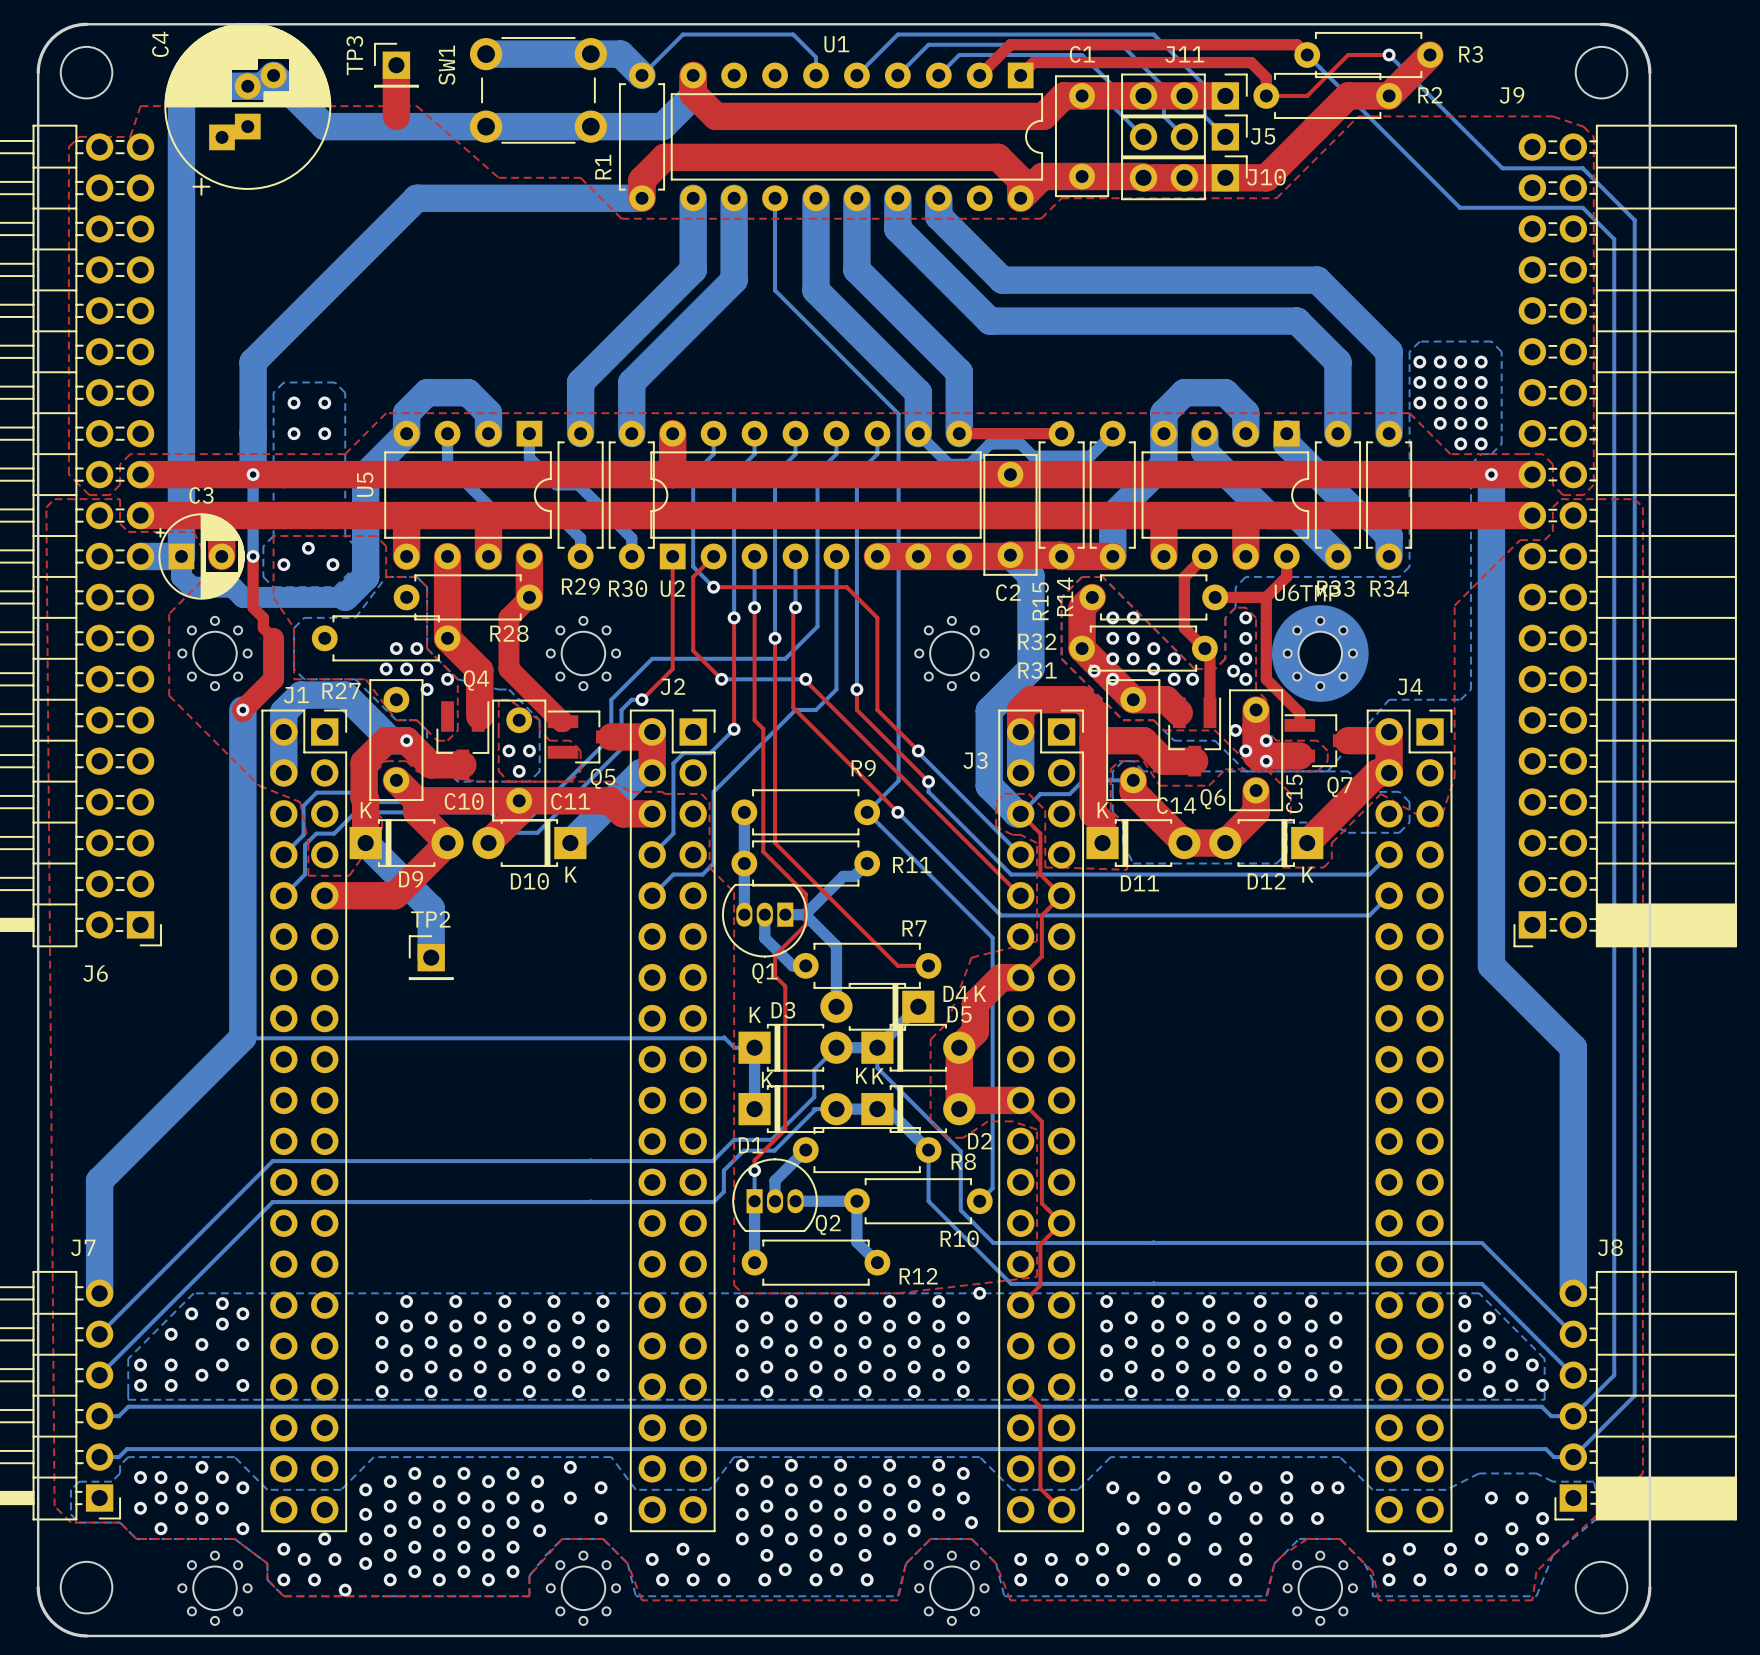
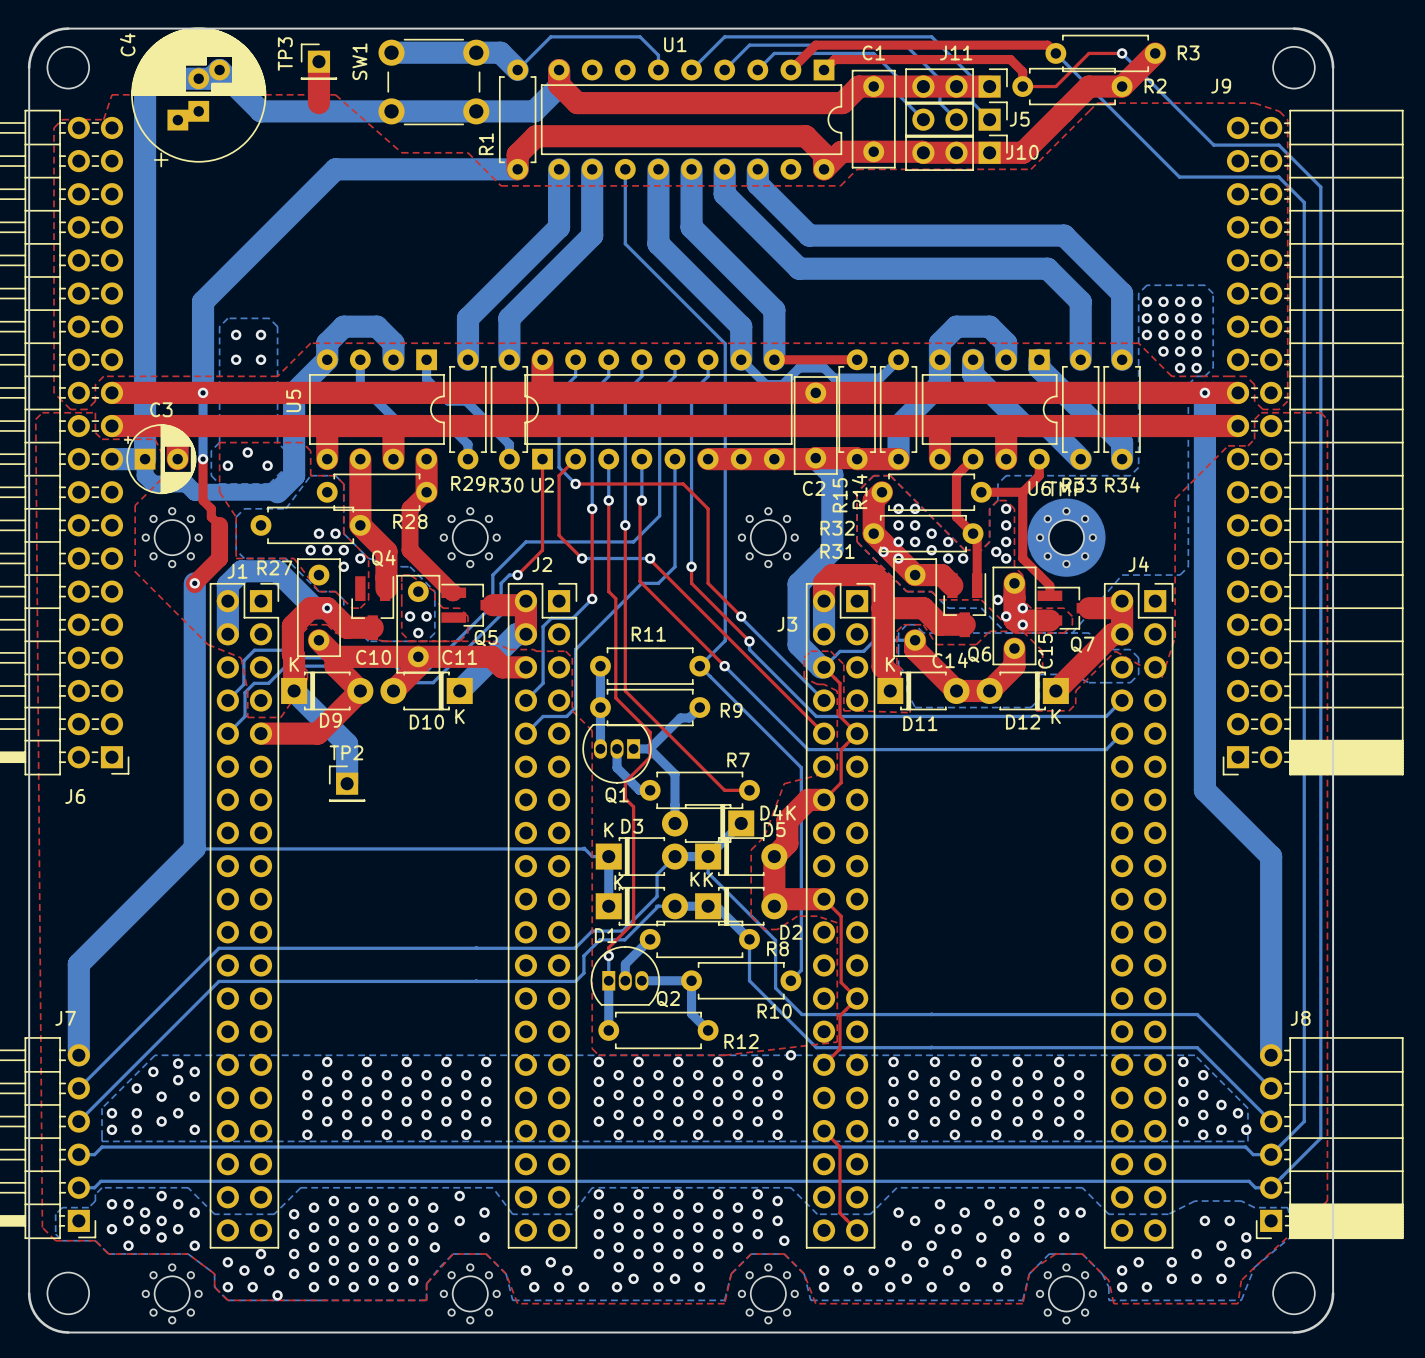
R9 name position: R9 (863, 768) -> R9 (731, 710)
R11 name position: R11 (912, 864) -> R11 (648, 634)

